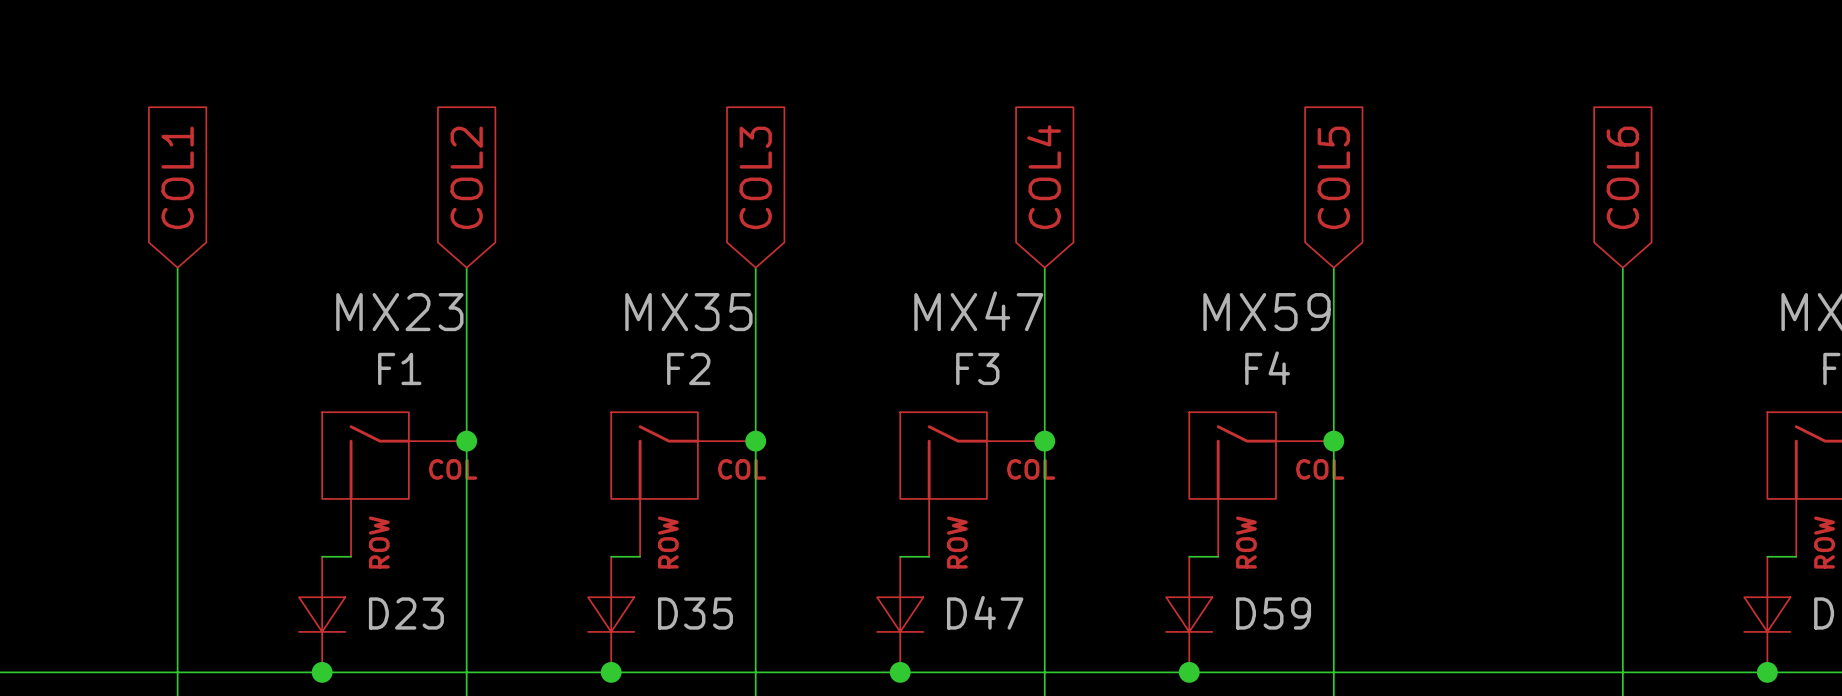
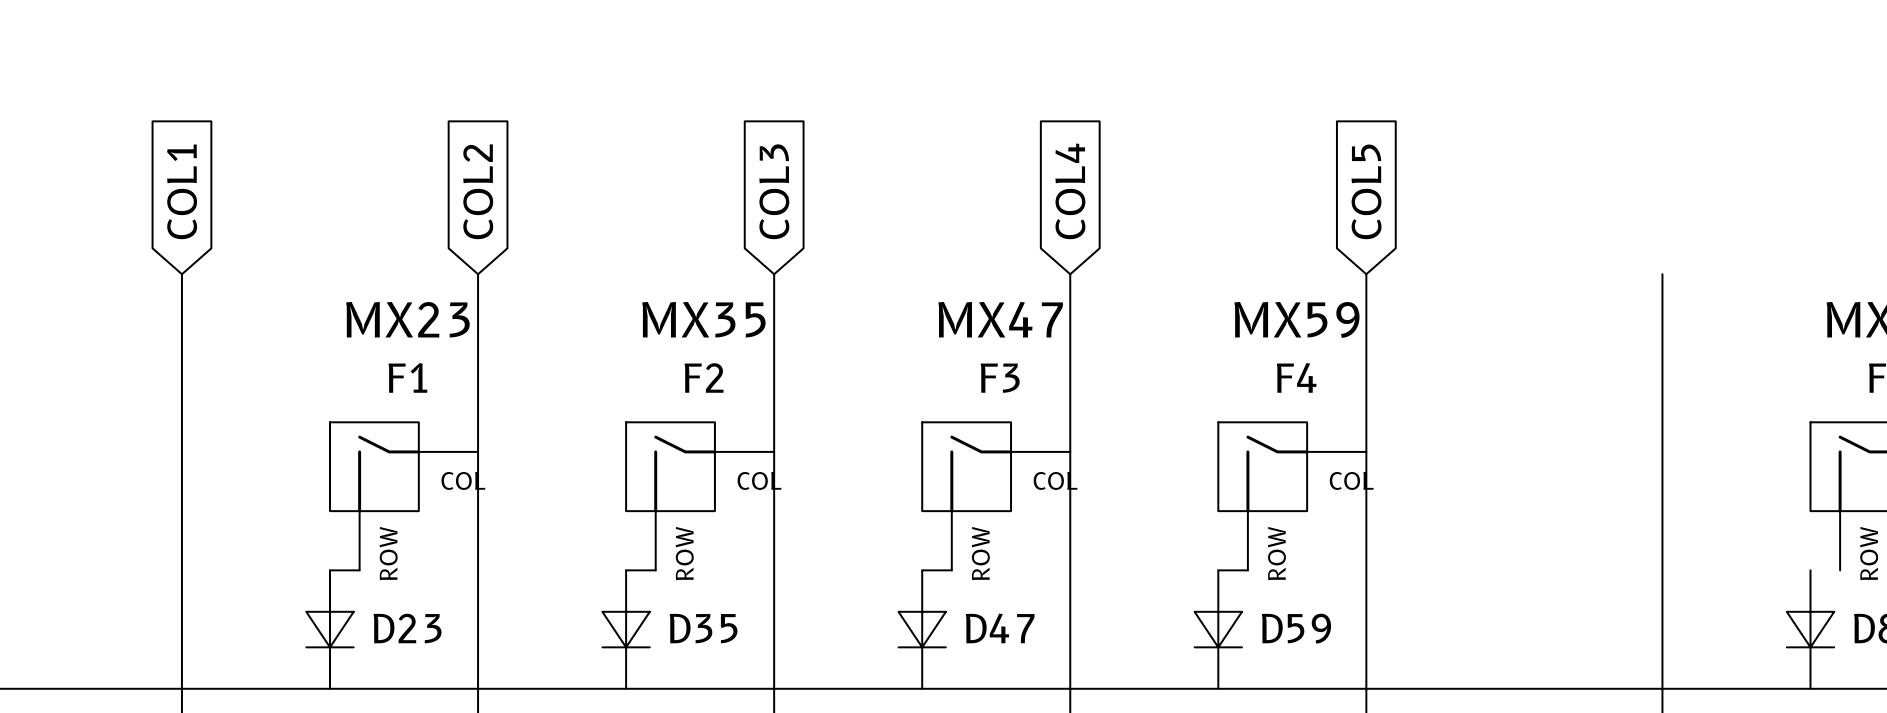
global label: COL6 (1622, 177) -> none
junction: (466, 441) -> none
junction: (755, 441) -> none
junction: (1044, 441) -> none
junction: (1333, 441) -> none
wire: (1767, 556) (1796, 556) -> none
junction: (322, 672) -> none
junction: (611, 672) -> none
junction: (900, 672) -> none
junction: (1189, 672) -> none
junction: (1767, 672) -> none

